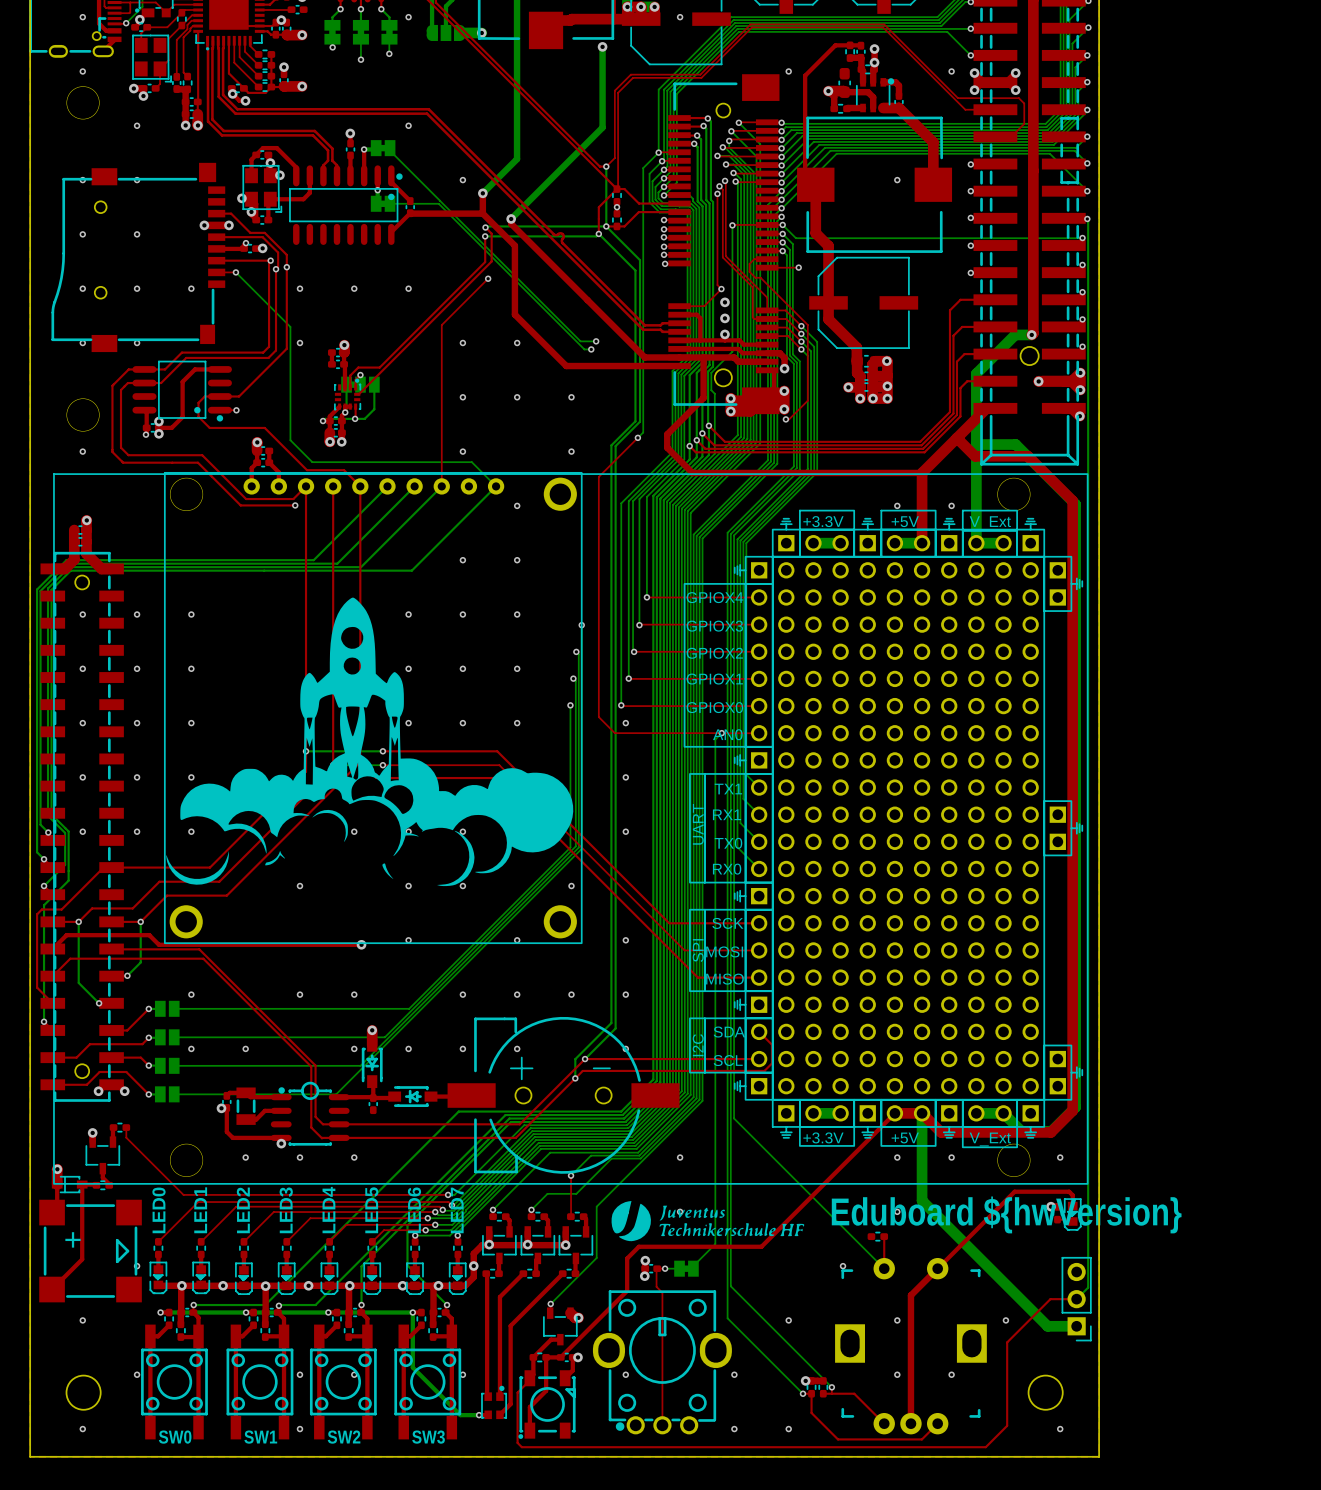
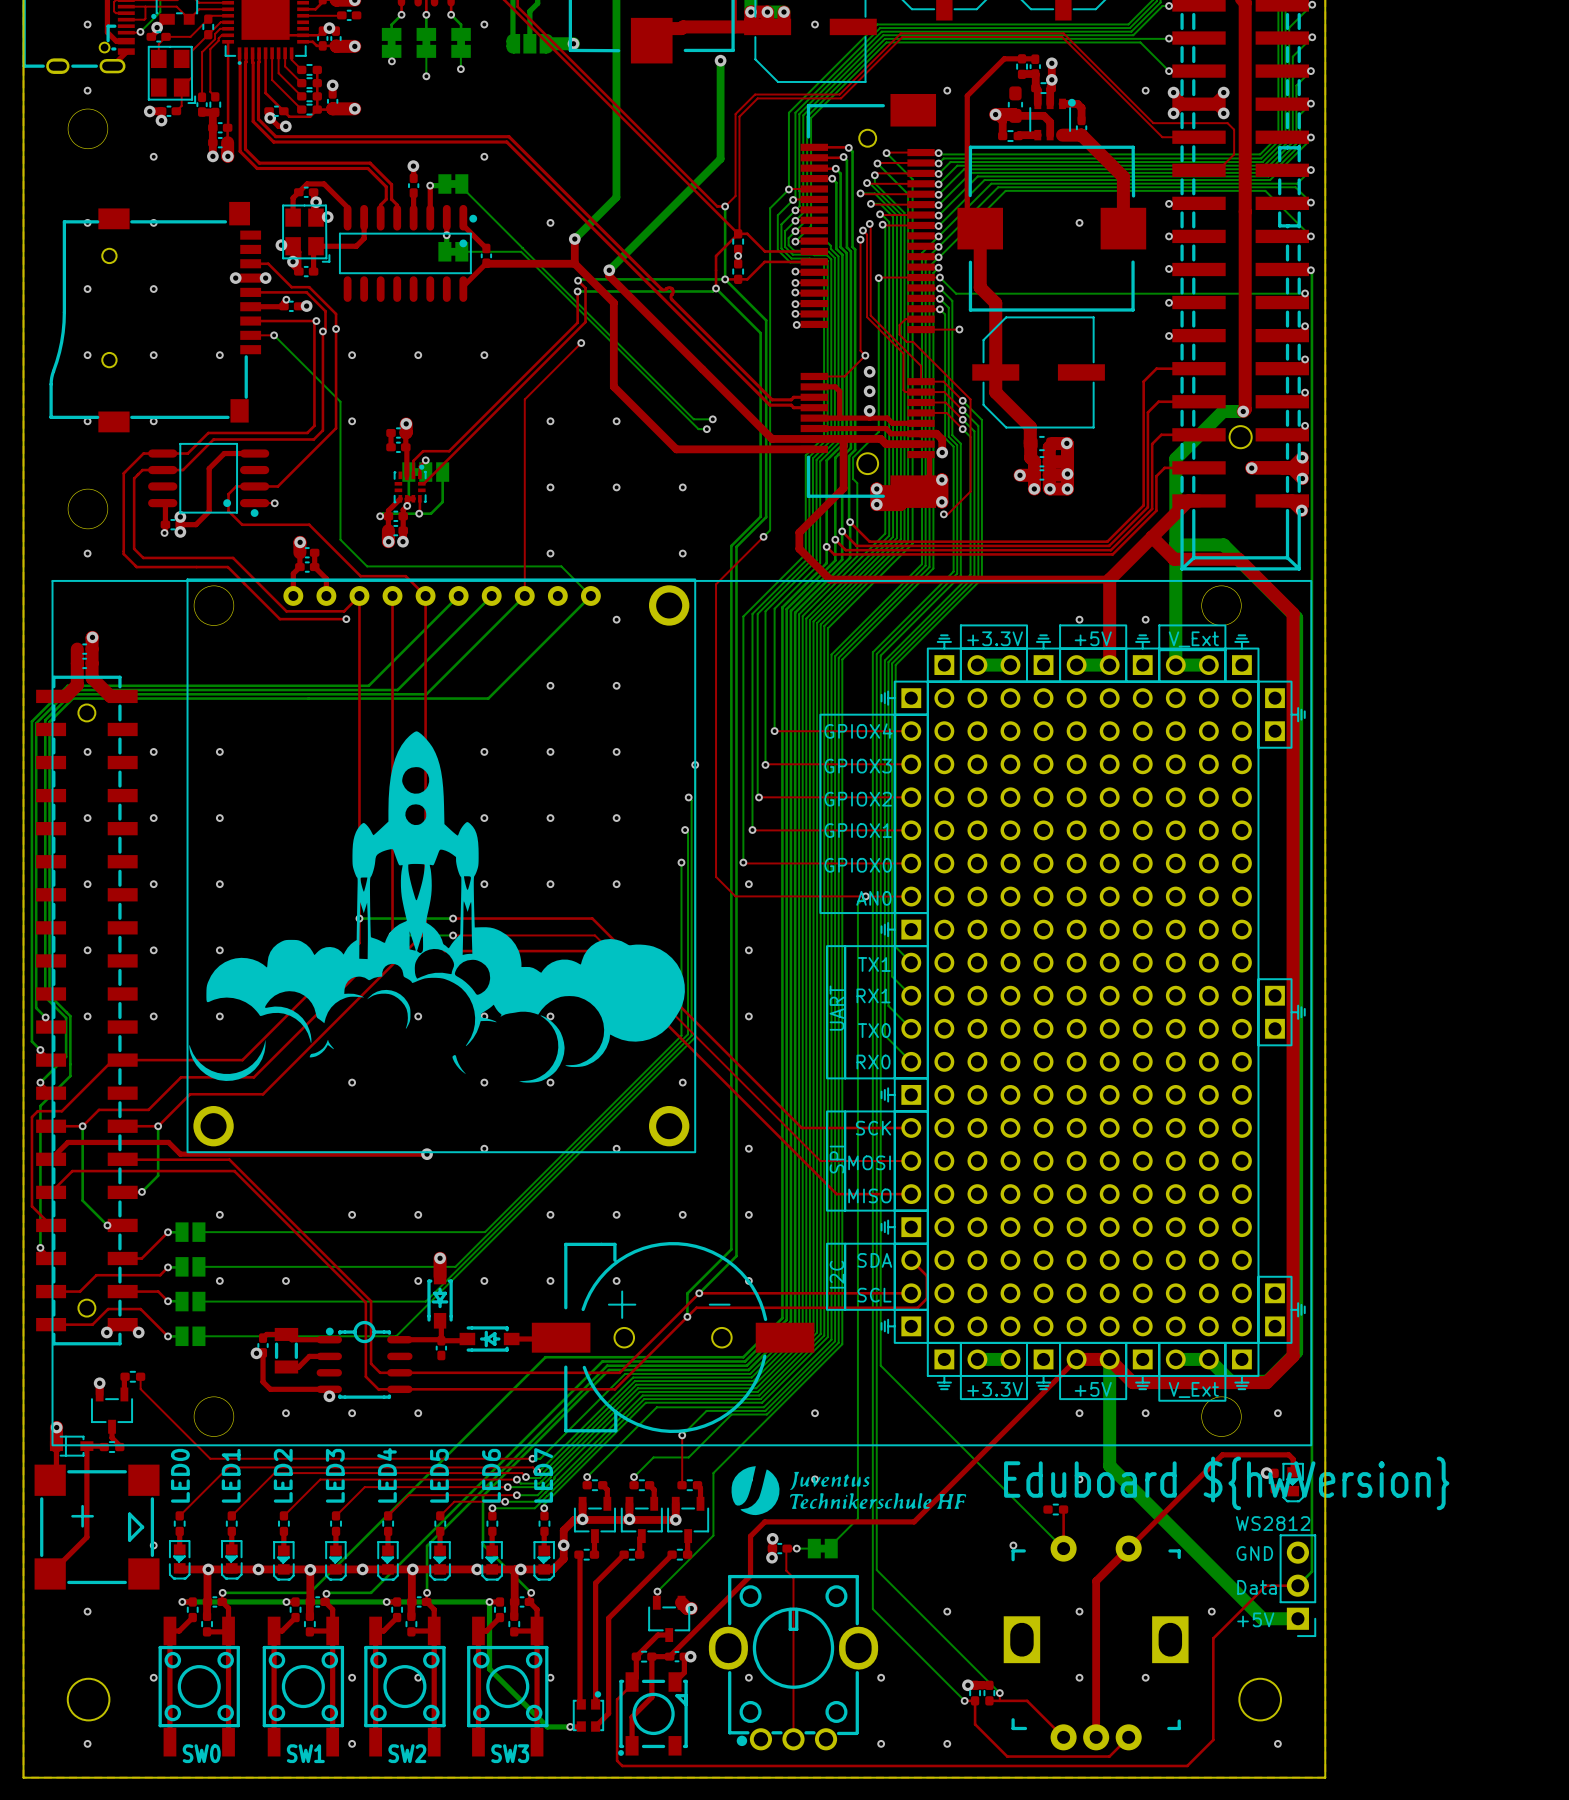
text: none -> WS2812 (1273, 1523)
text: none -> GND (1254, 1553)
text: none -> Data (1257, 1587)
text: none -> +5V (1255, 1619)

